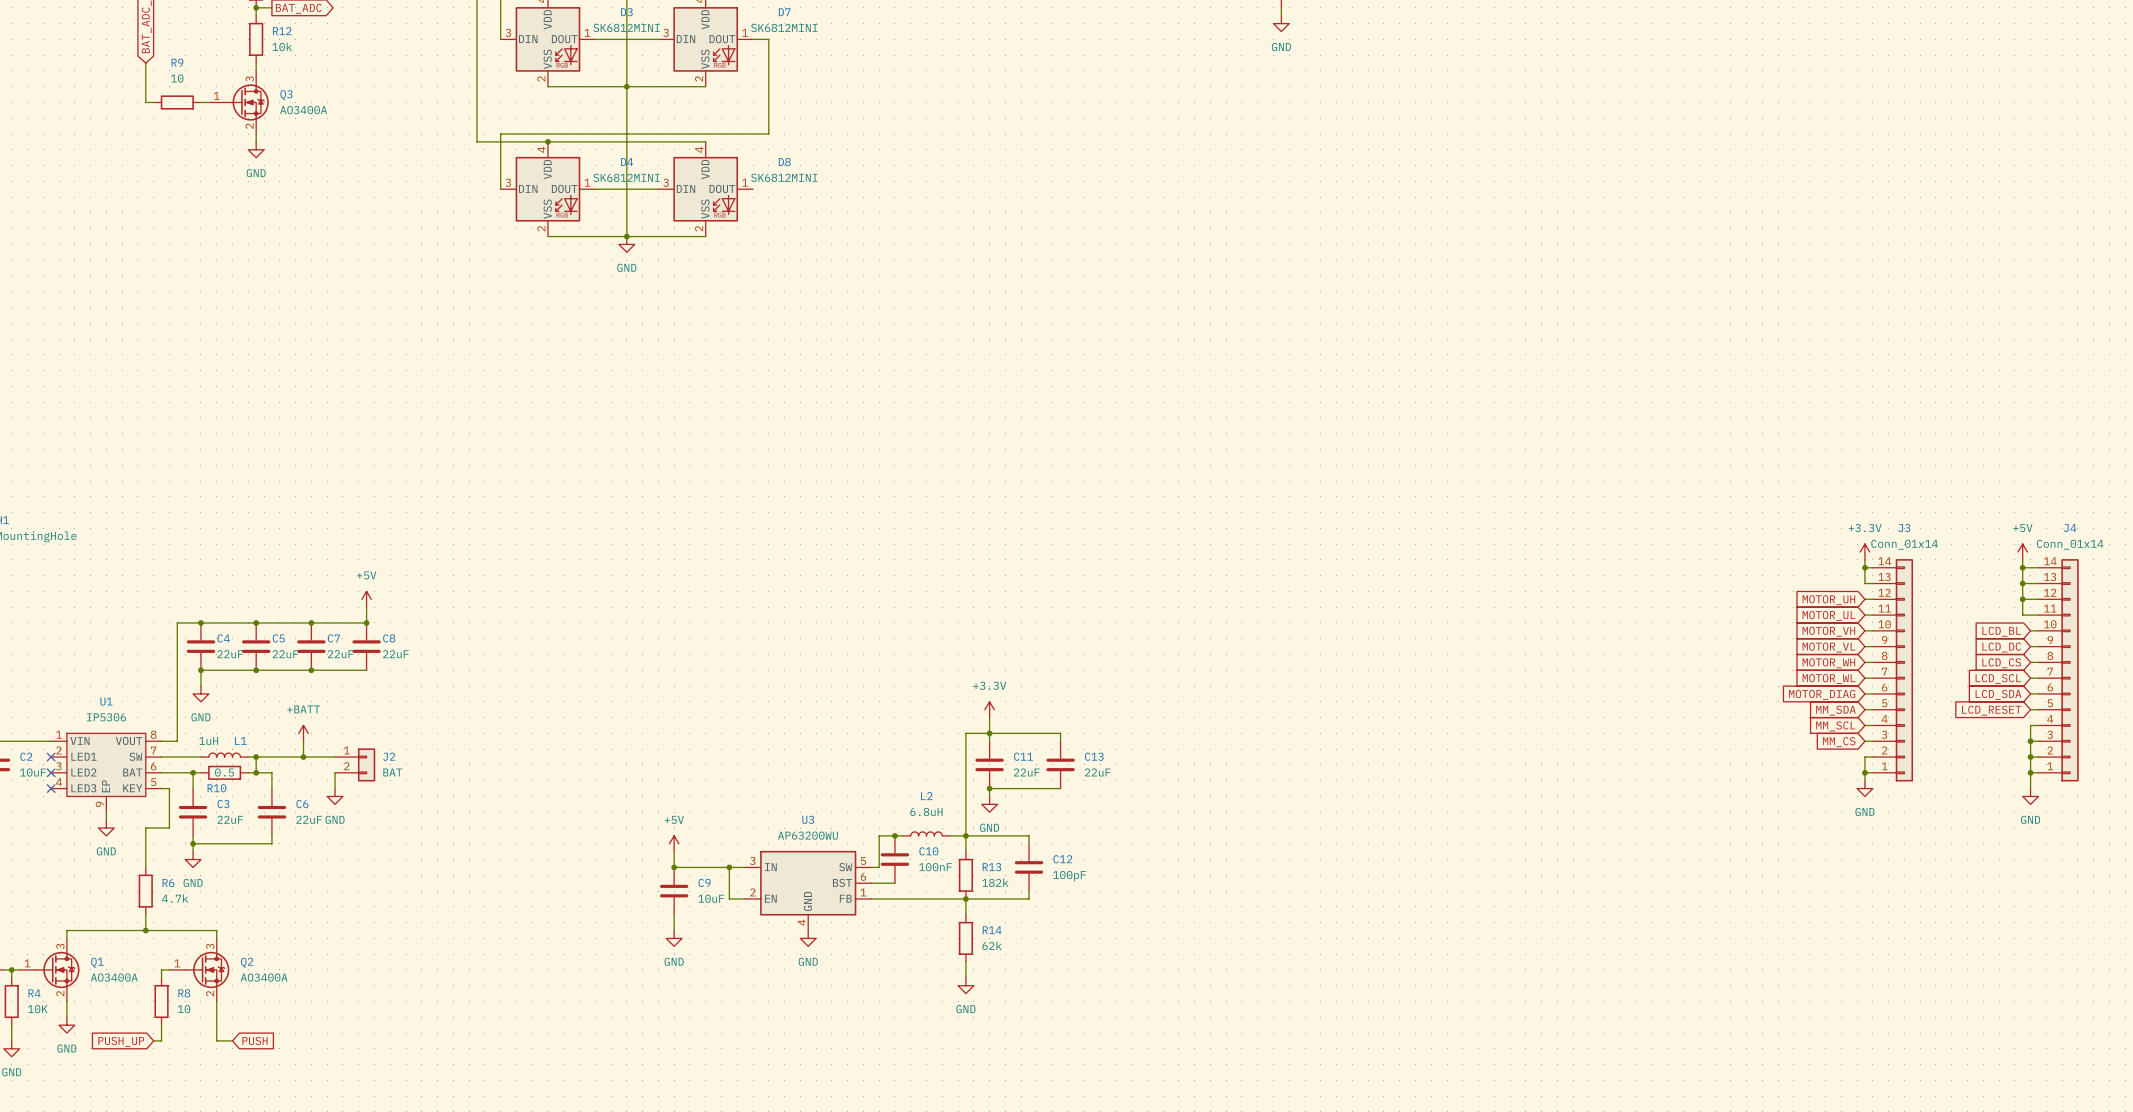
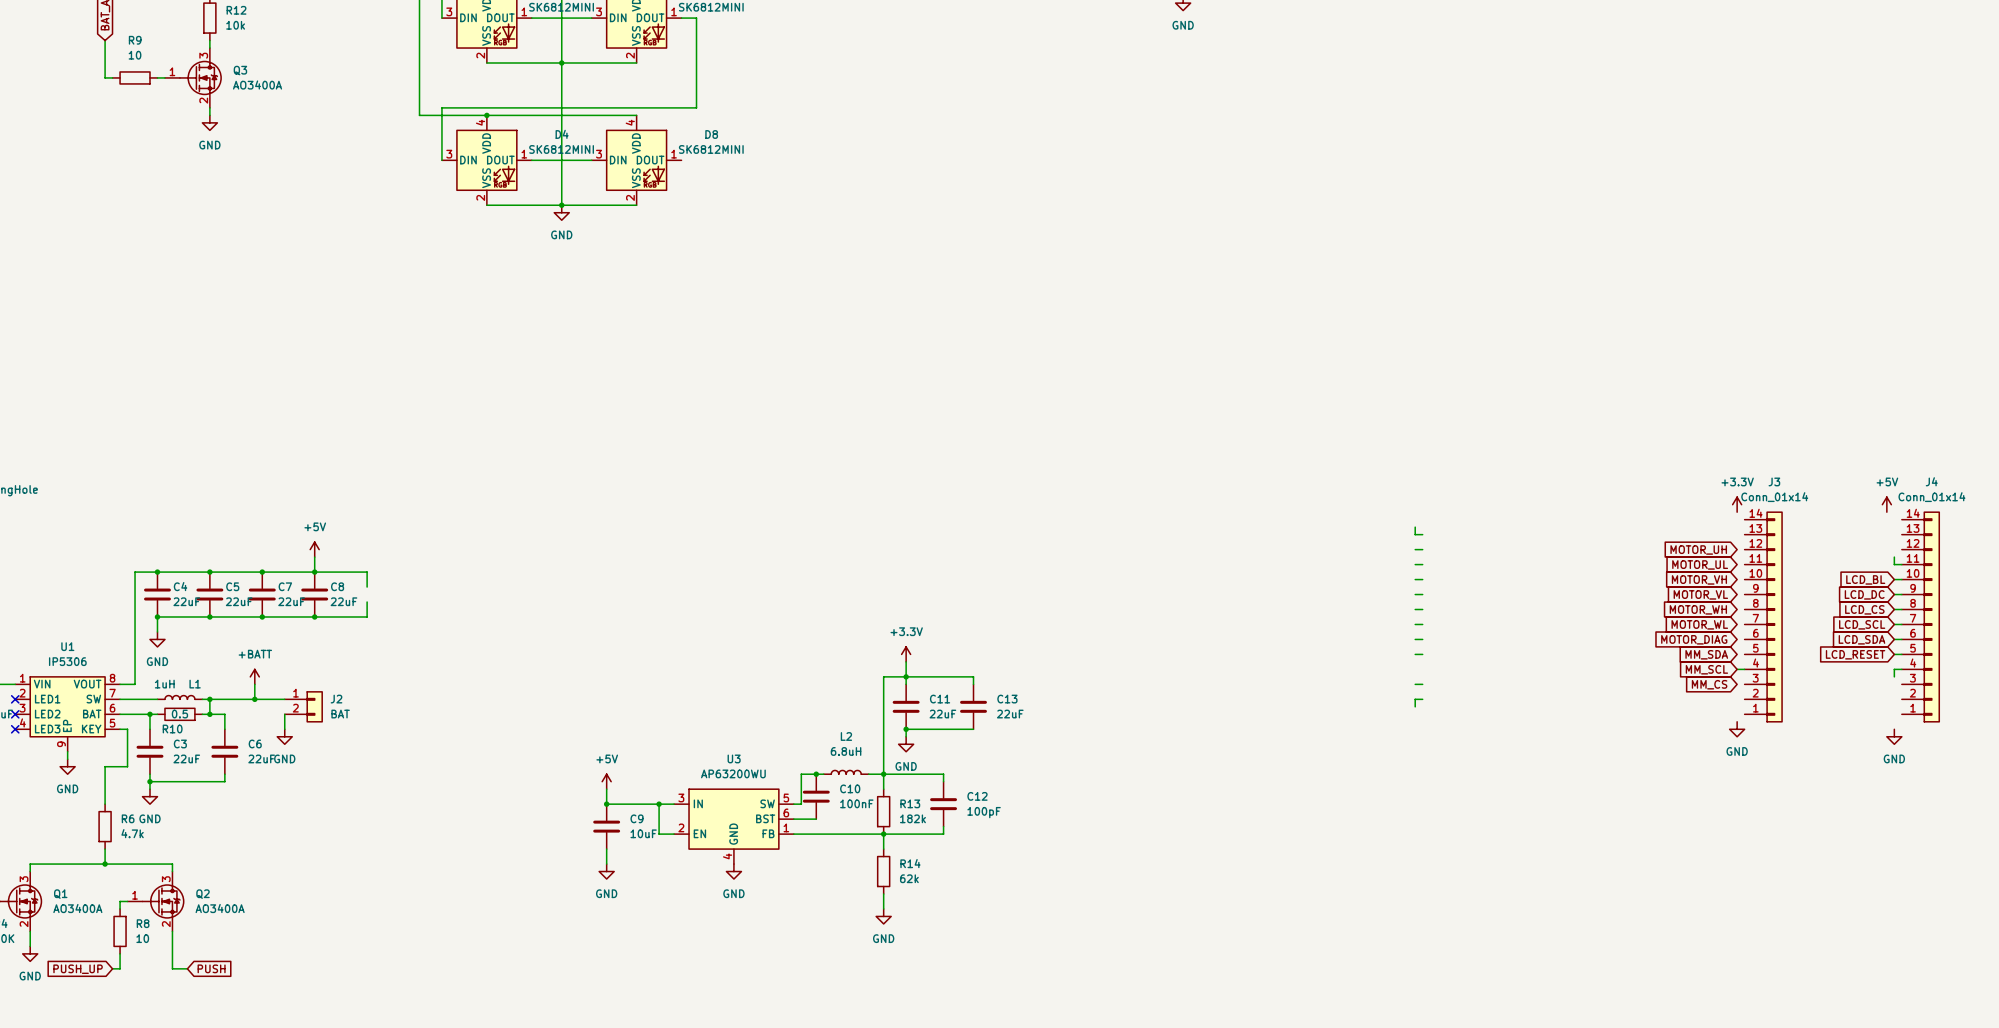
wire: (1864, 559) (1864, 583) (1872, 583) -> none
wire: (2022, 559) (2022, 615) (2030, 615) -> (1894, 557) (1894, 564)
wire: (1864, 567) (1872, 567) -> none
junction: (1864, 567) -> none
wire: (2022, 567) (2038, 567) -> none
junction: (2022, 567) -> none
wire: none -> (1415, 527) (1415, 534) (1422, 534)
wire: (2022, 583) (2038, 583) -> none
junction: (2022, 583) -> none
wire: none -> (1415, 549) (1422, 549)
wire: (1864, 599) (1872, 599) -> none
wire: (2022, 599) (2038, 599) -> none
junction: (2022, 599) -> none
wire: none -> (1415, 564) (1422, 564)
wire: (1864, 615) (1872, 615) -> none
wire: none -> (314, 572) (367, 572) (367, 587)
wire: none -> (1415, 579) (1422, 579)
wire: (1864, 630) (1872, 630) -> none
wire: none -> (1415, 594) (1422, 594)
wire: (1864, 646) (1872, 646) -> none
wire: none -> (367, 602) (367, 616) (314, 616)
wire: none -> (1415, 609) (1422, 609)
wire: (1864, 662) (1872, 662) -> none
junction: none -> (314, 616)
wire: none -> (1415, 624) (1422, 624)
wire: (1864, 678) (1872, 678) -> none
wire: none -> (1415, 639) (1422, 639)
wire: (1864, 693) (1872, 693) -> none
wire: none -> (1415, 654) (1422, 654)
wire: (1864, 709) (1872, 709) -> none
wire: (2030, 733) (2030, 788) -> none
wire: none -> (1415, 684) (1422, 684)
wire: (1864, 741) (1872, 741) -> none
wire: (2030, 741) (2038, 741) -> none
junction: (2030, 741) -> none
wire: none -> (1422, 699) (1415, 699) (1415, 706)
wire: (1872, 757) (1864, 757) (1864, 780) -> none
wire: (2030, 757) (2038, 757) -> none
junction: (2030, 757) -> none
wire: (1864, 772) (1872, 772) -> none
junction: (1864, 772) -> none
wire: (2030, 772) (2038, 772) -> none
junction: (2030, 772) -> none

